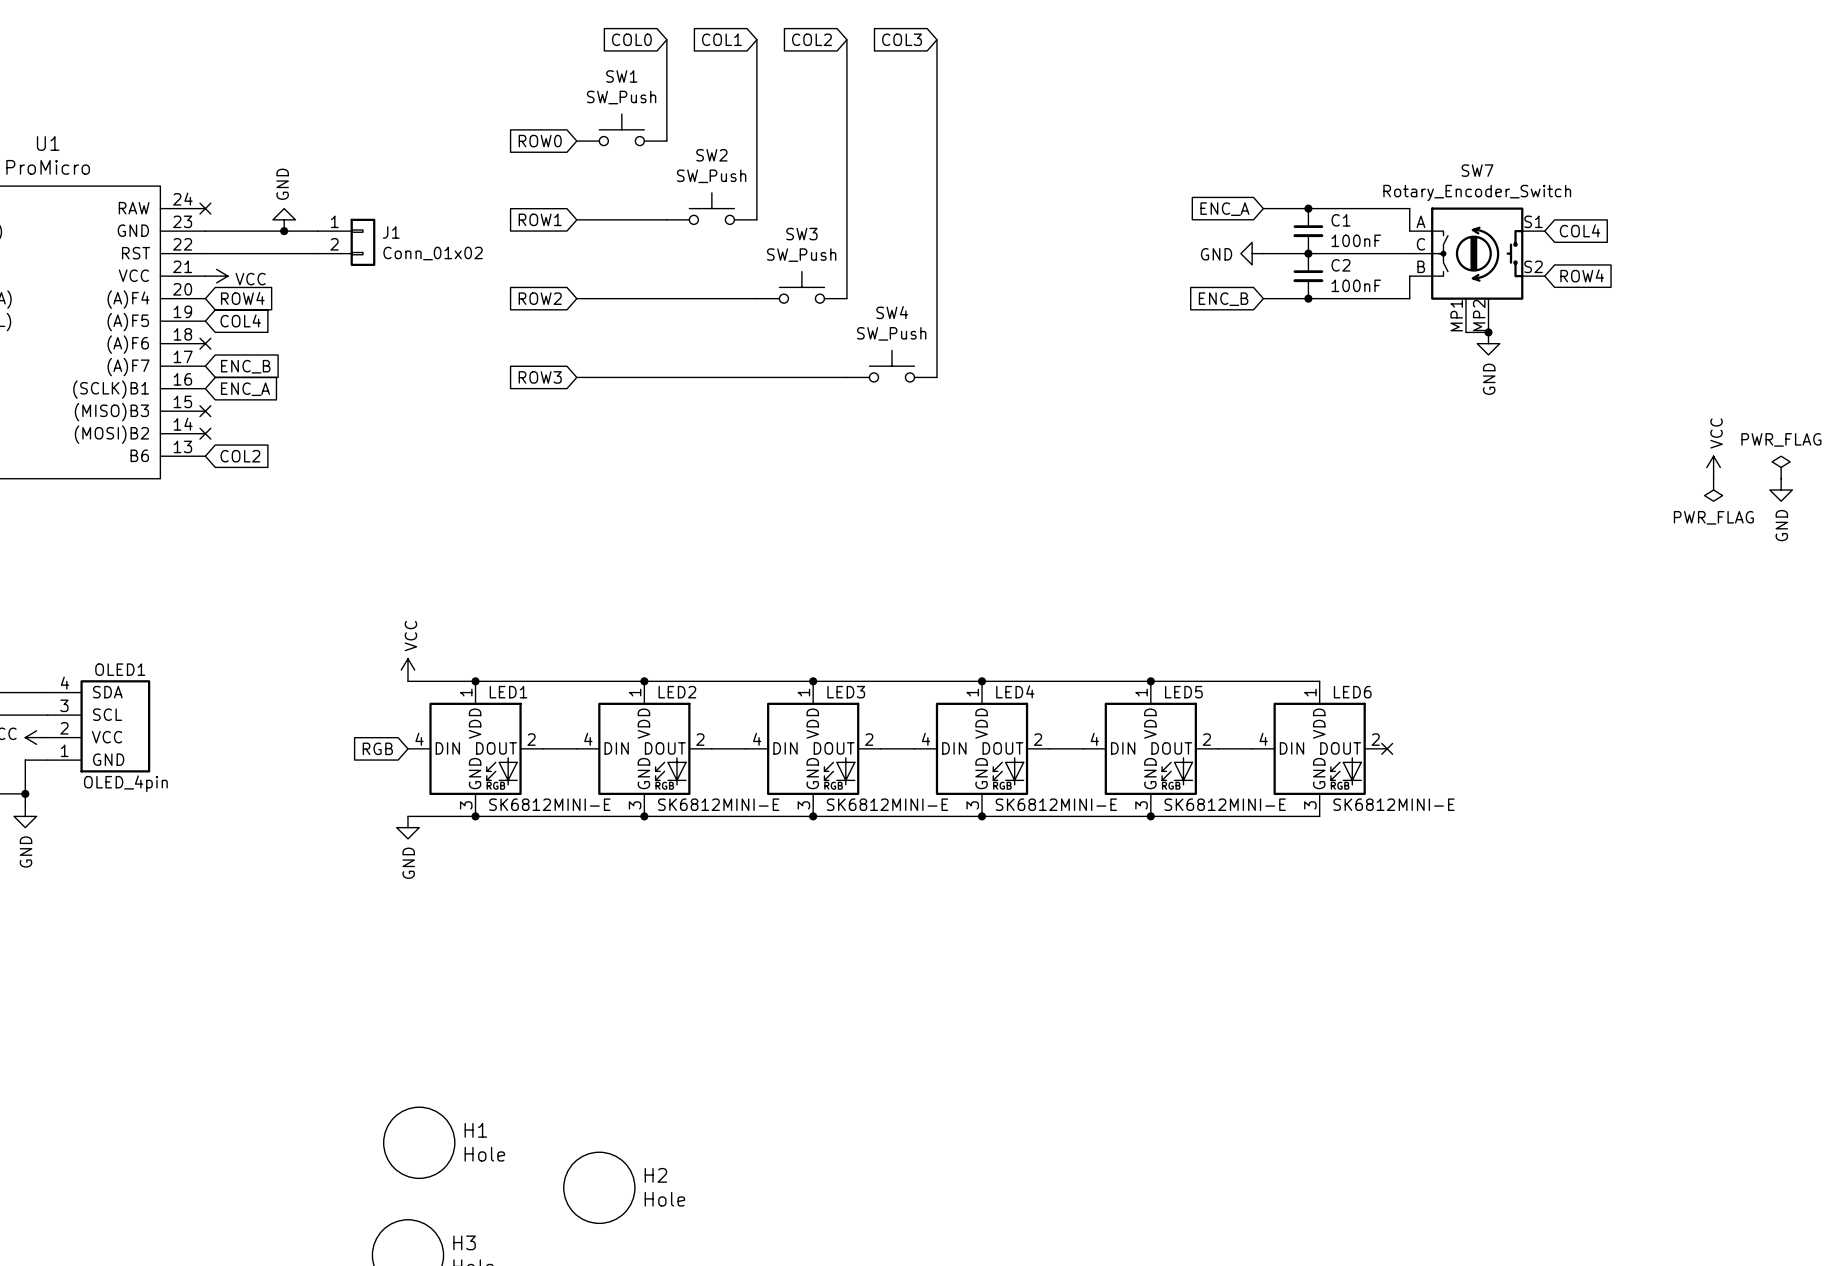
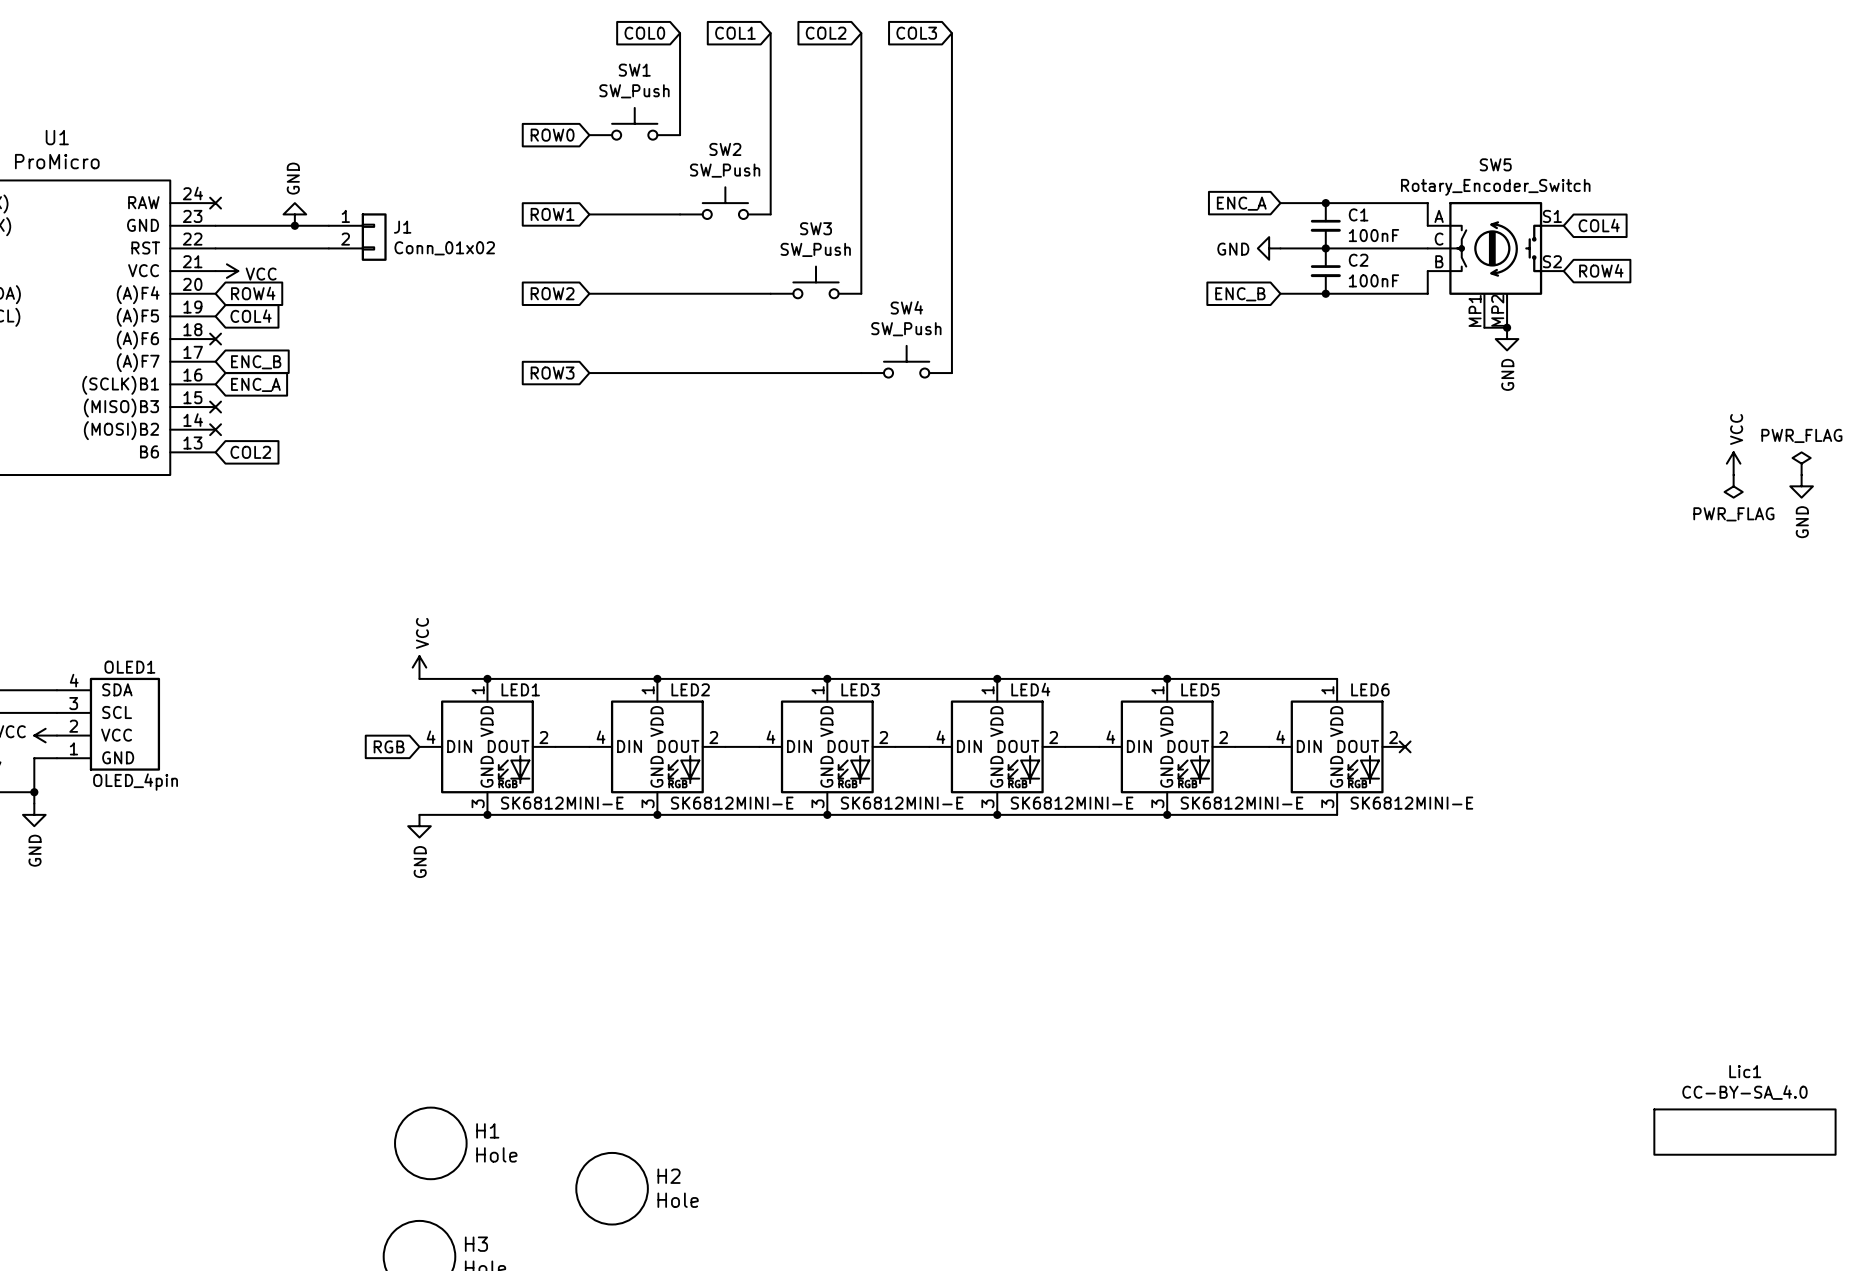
SW7 name: SW7 (1477, 170) -> SW5 (1495, 164)
Lic1: none -> CC-BY-SA_4.0 (1744, 1132)

